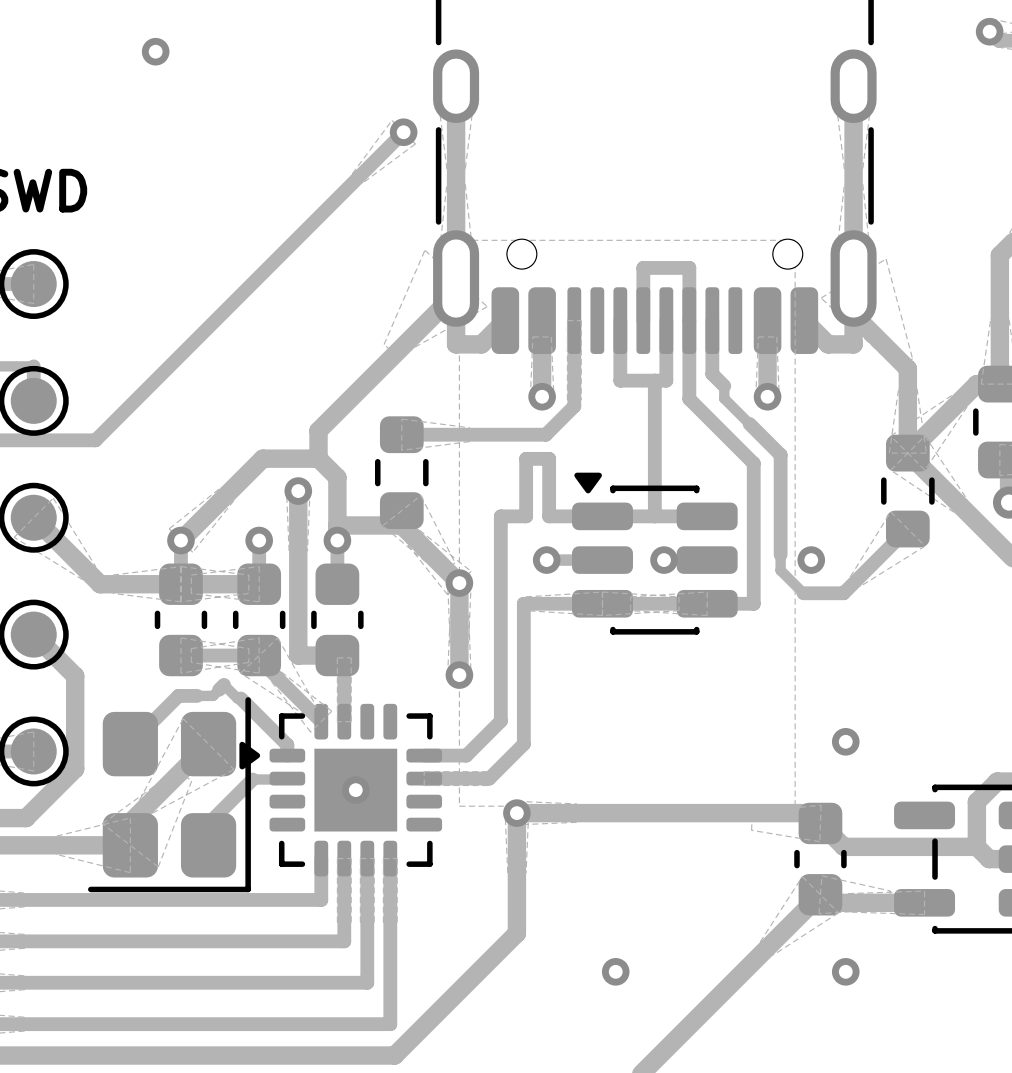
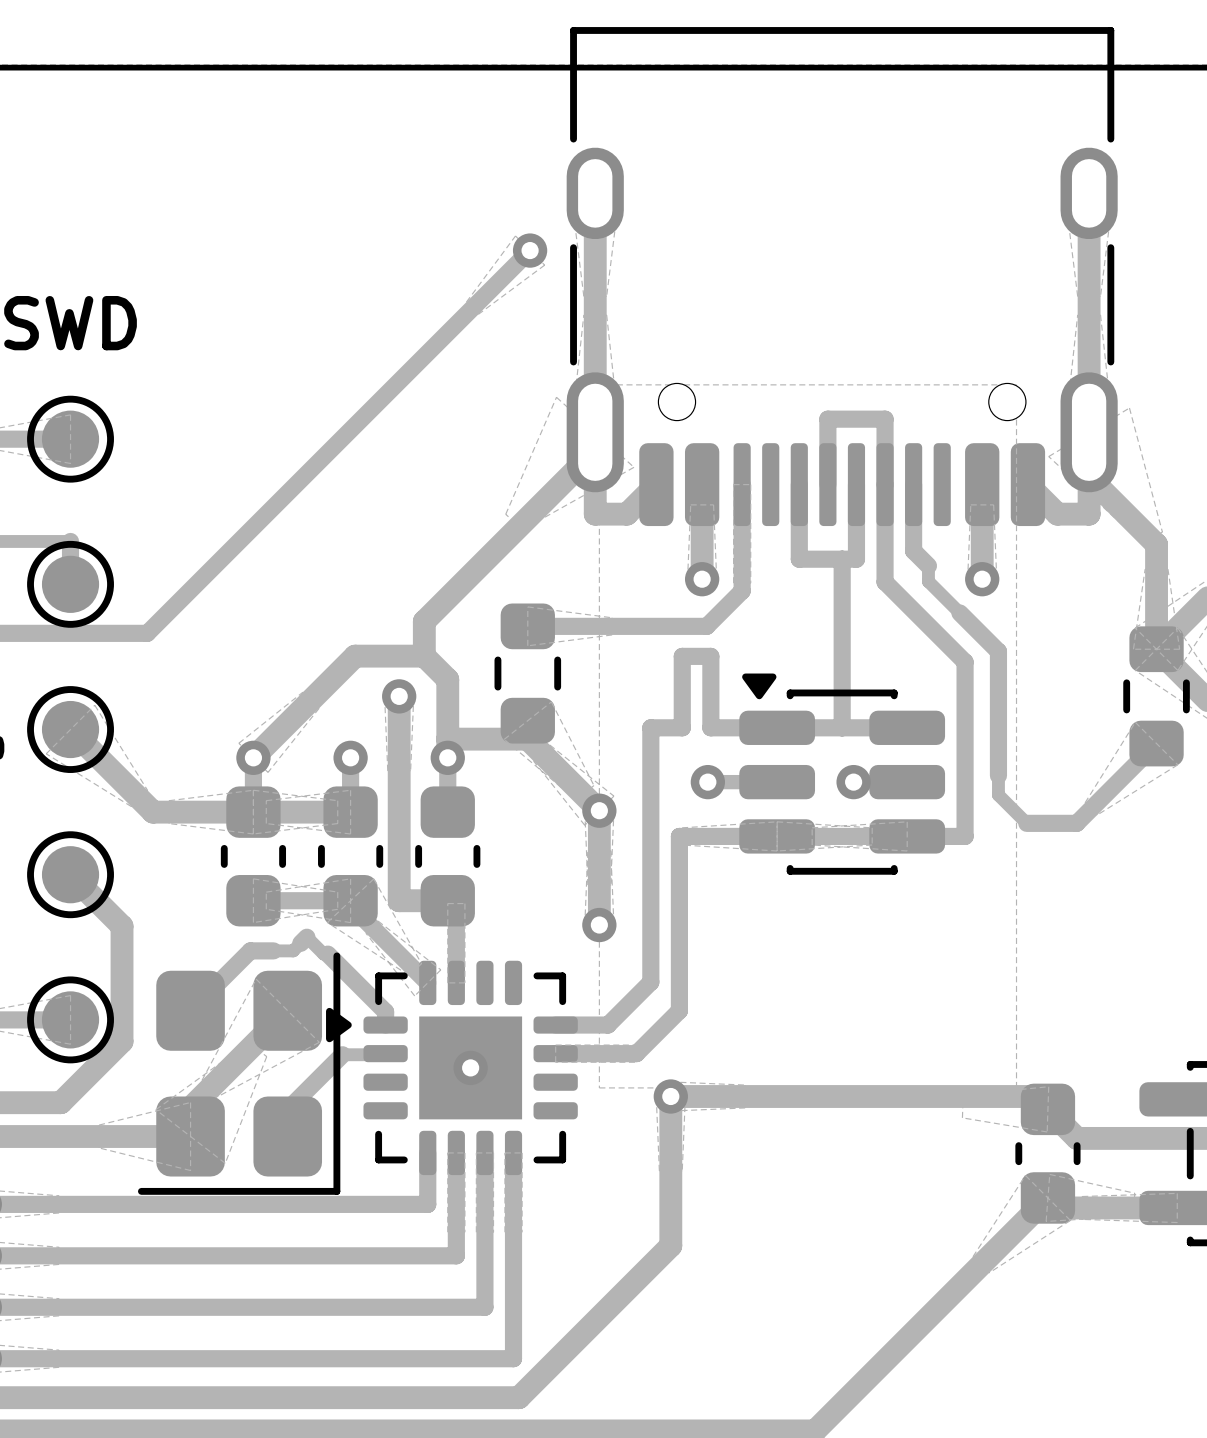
via: (155, 51) -> none
via: (811, 560) -> none
via: (845, 741) -> none
via: (615, 971) -> none
via: (845, 971) -> none

